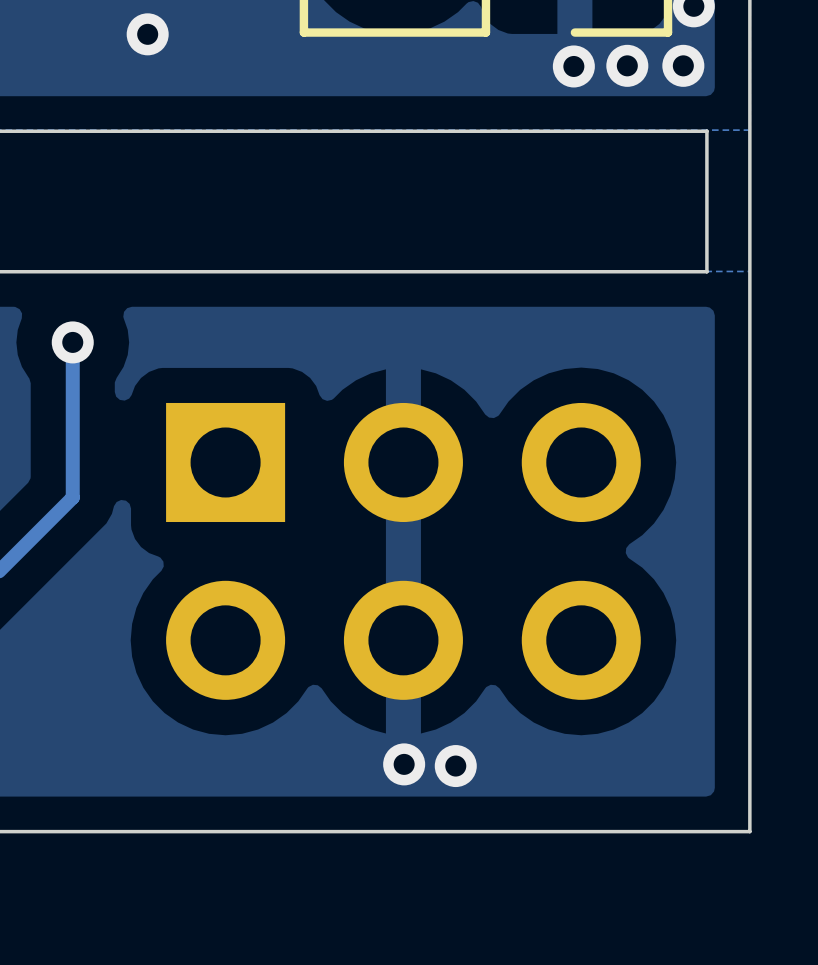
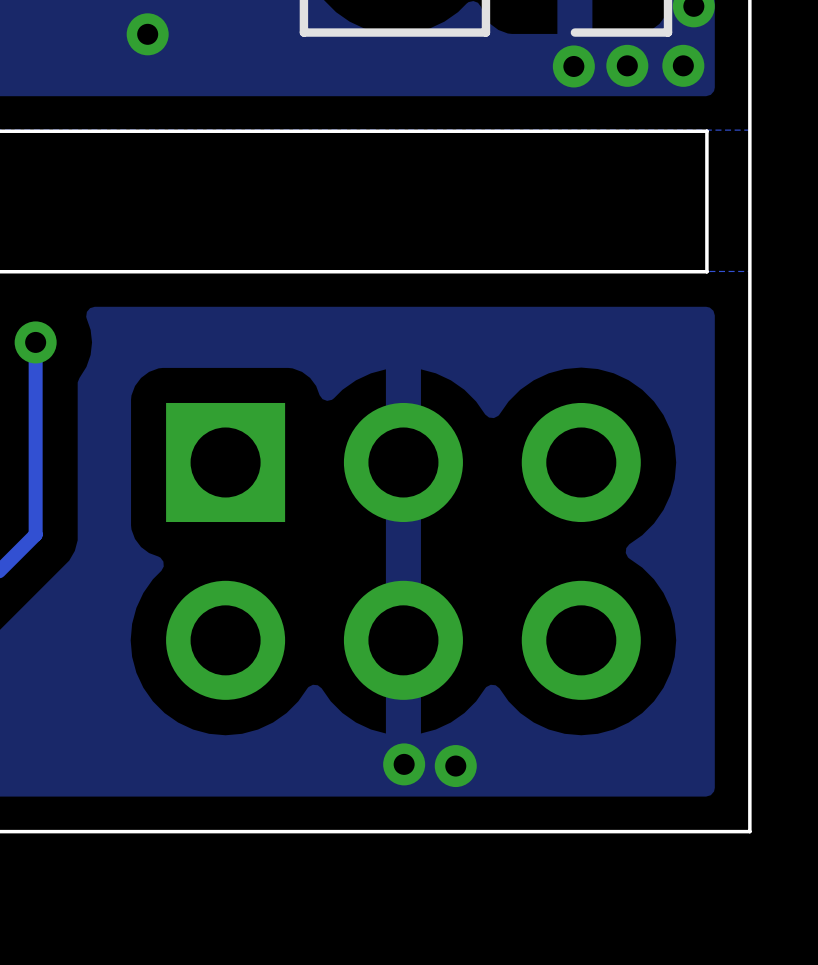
track: (72, 342) (72, 497) (35, 534) -> (35, 342) (35, 534)
via position: (72, 342) -> (35, 342)

